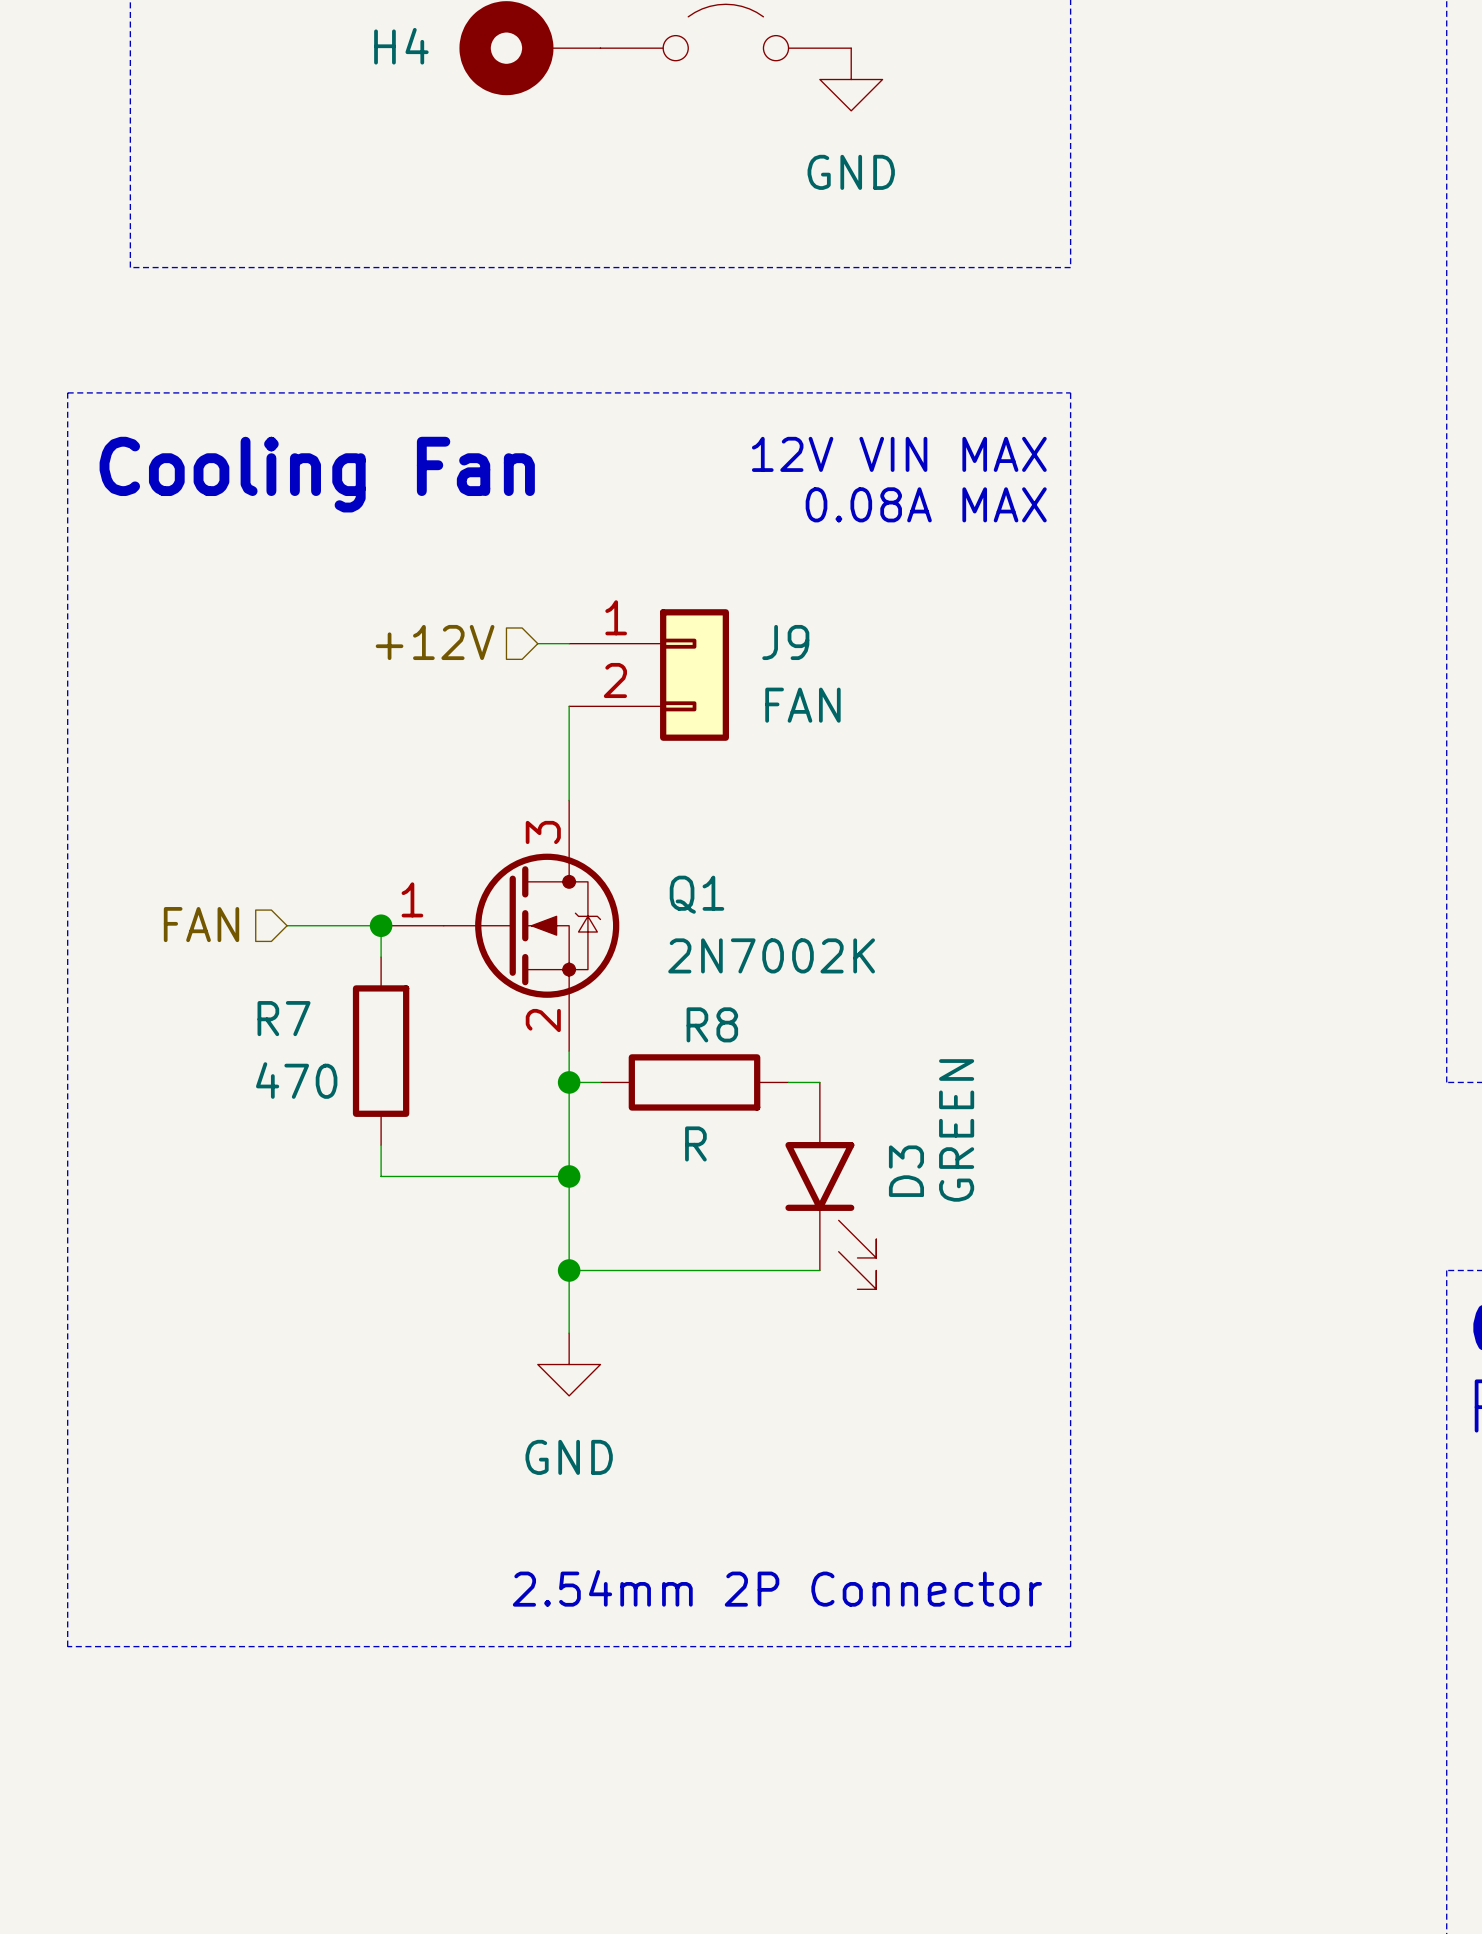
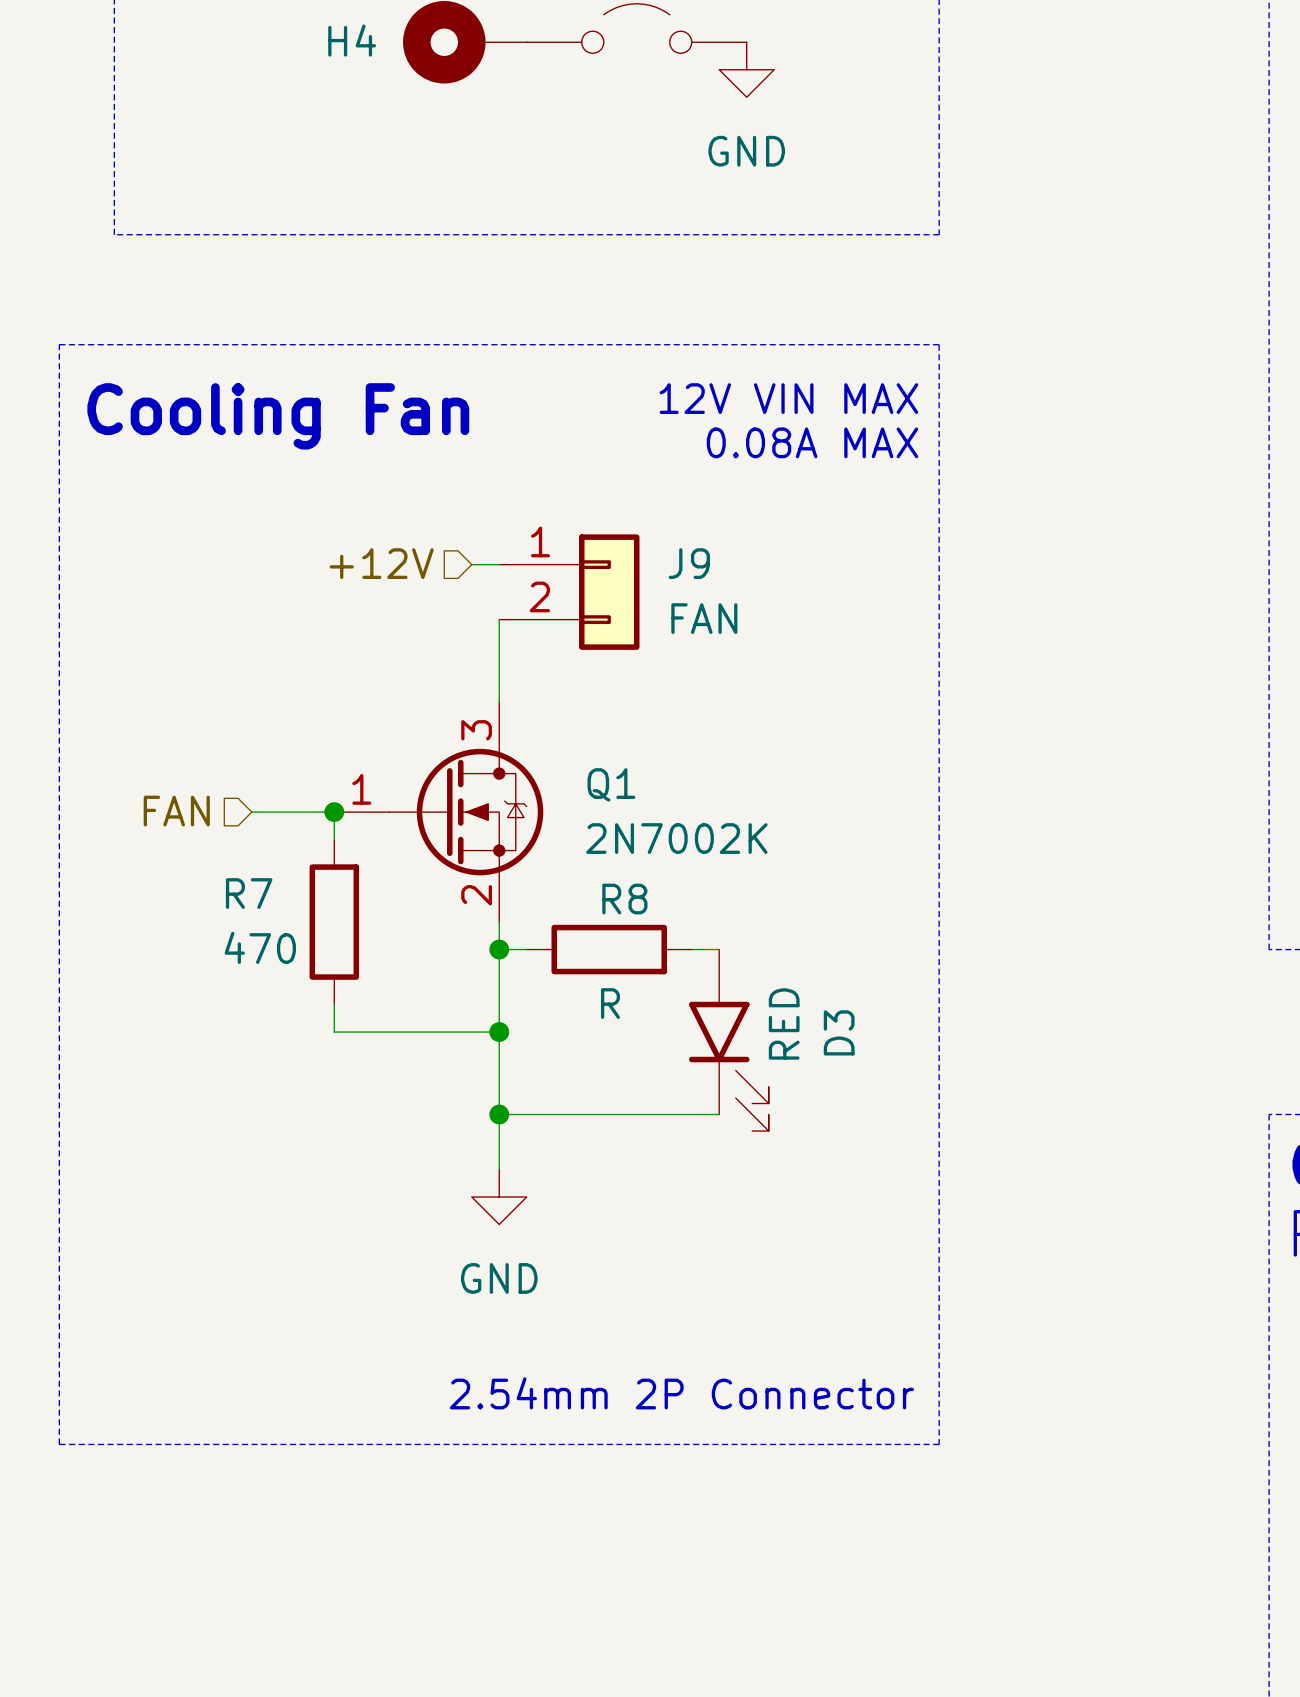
D3 text: GREEN (956, 1130) -> RED (784, 1023)
D3 name position: D3 (906, 1171) -> D3 (839, 1032)

